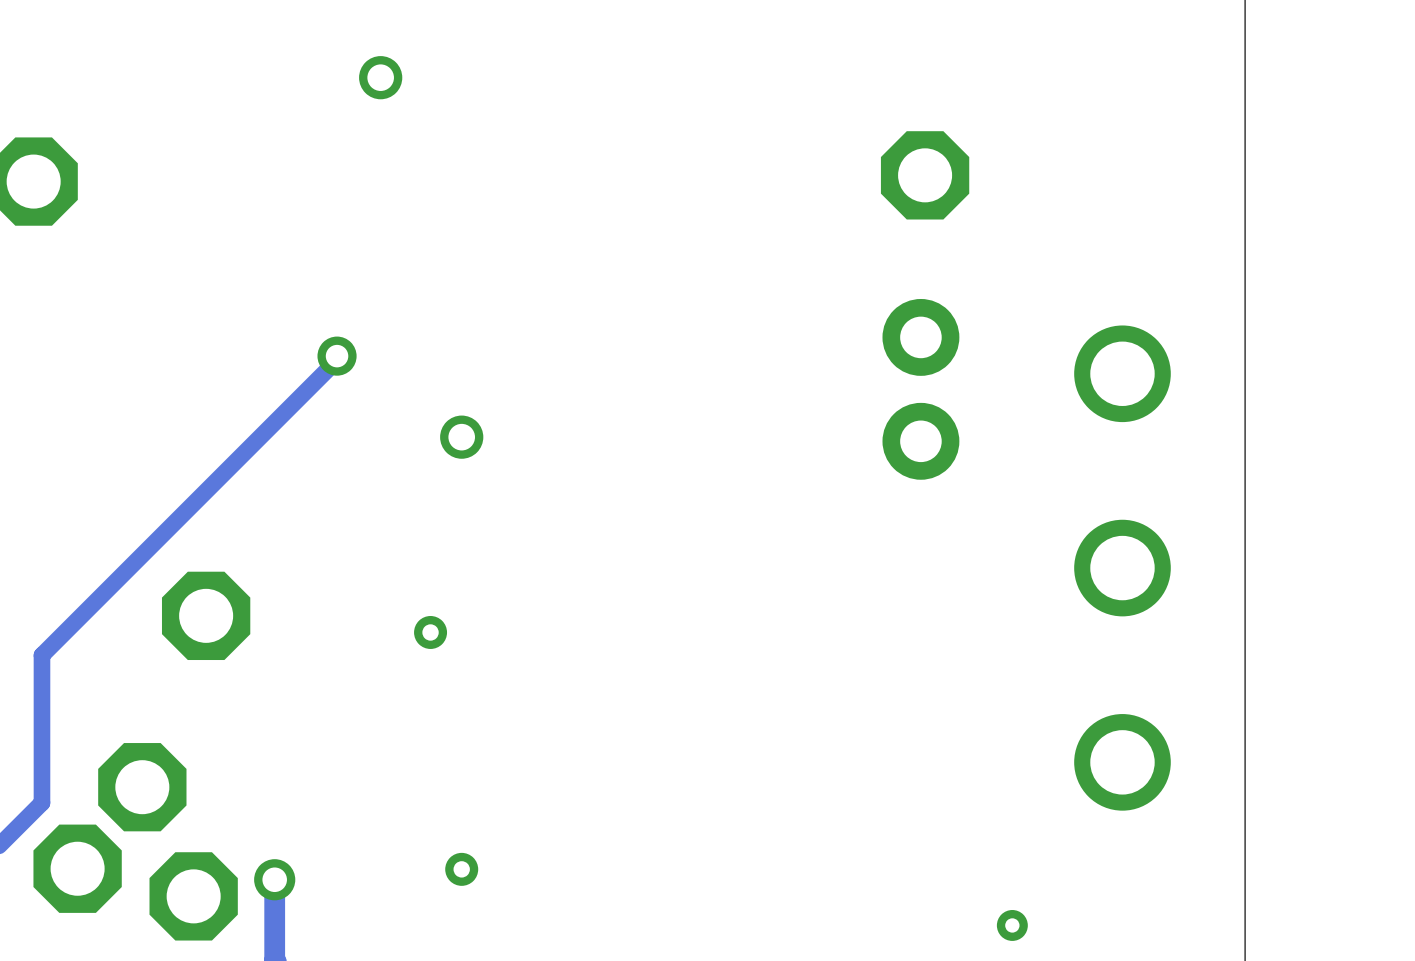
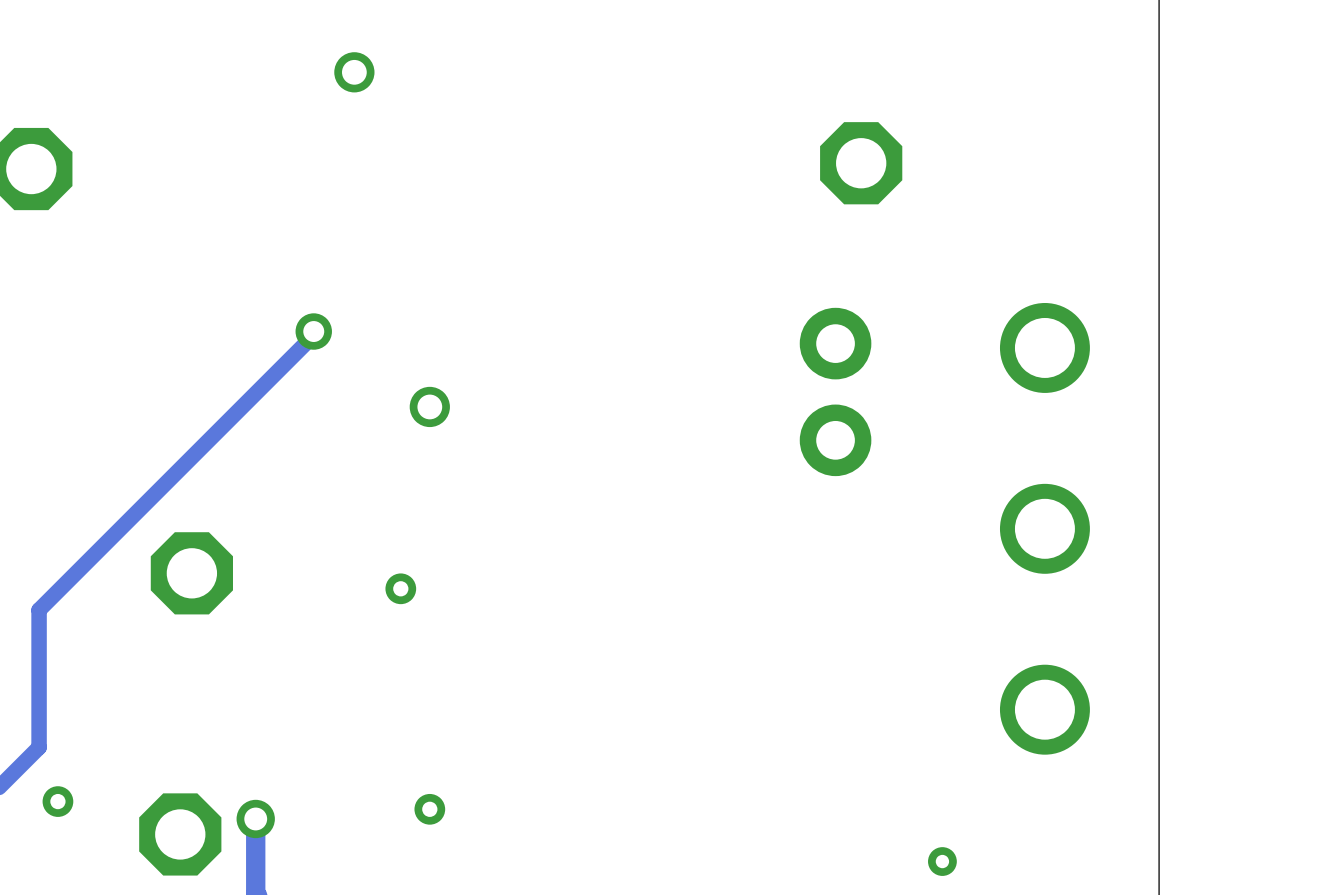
part position: (920, 389) -> (835, 391)
part: (142, 787) -> none
via: none -> (57, 801)
part: (77, 868) -> none

